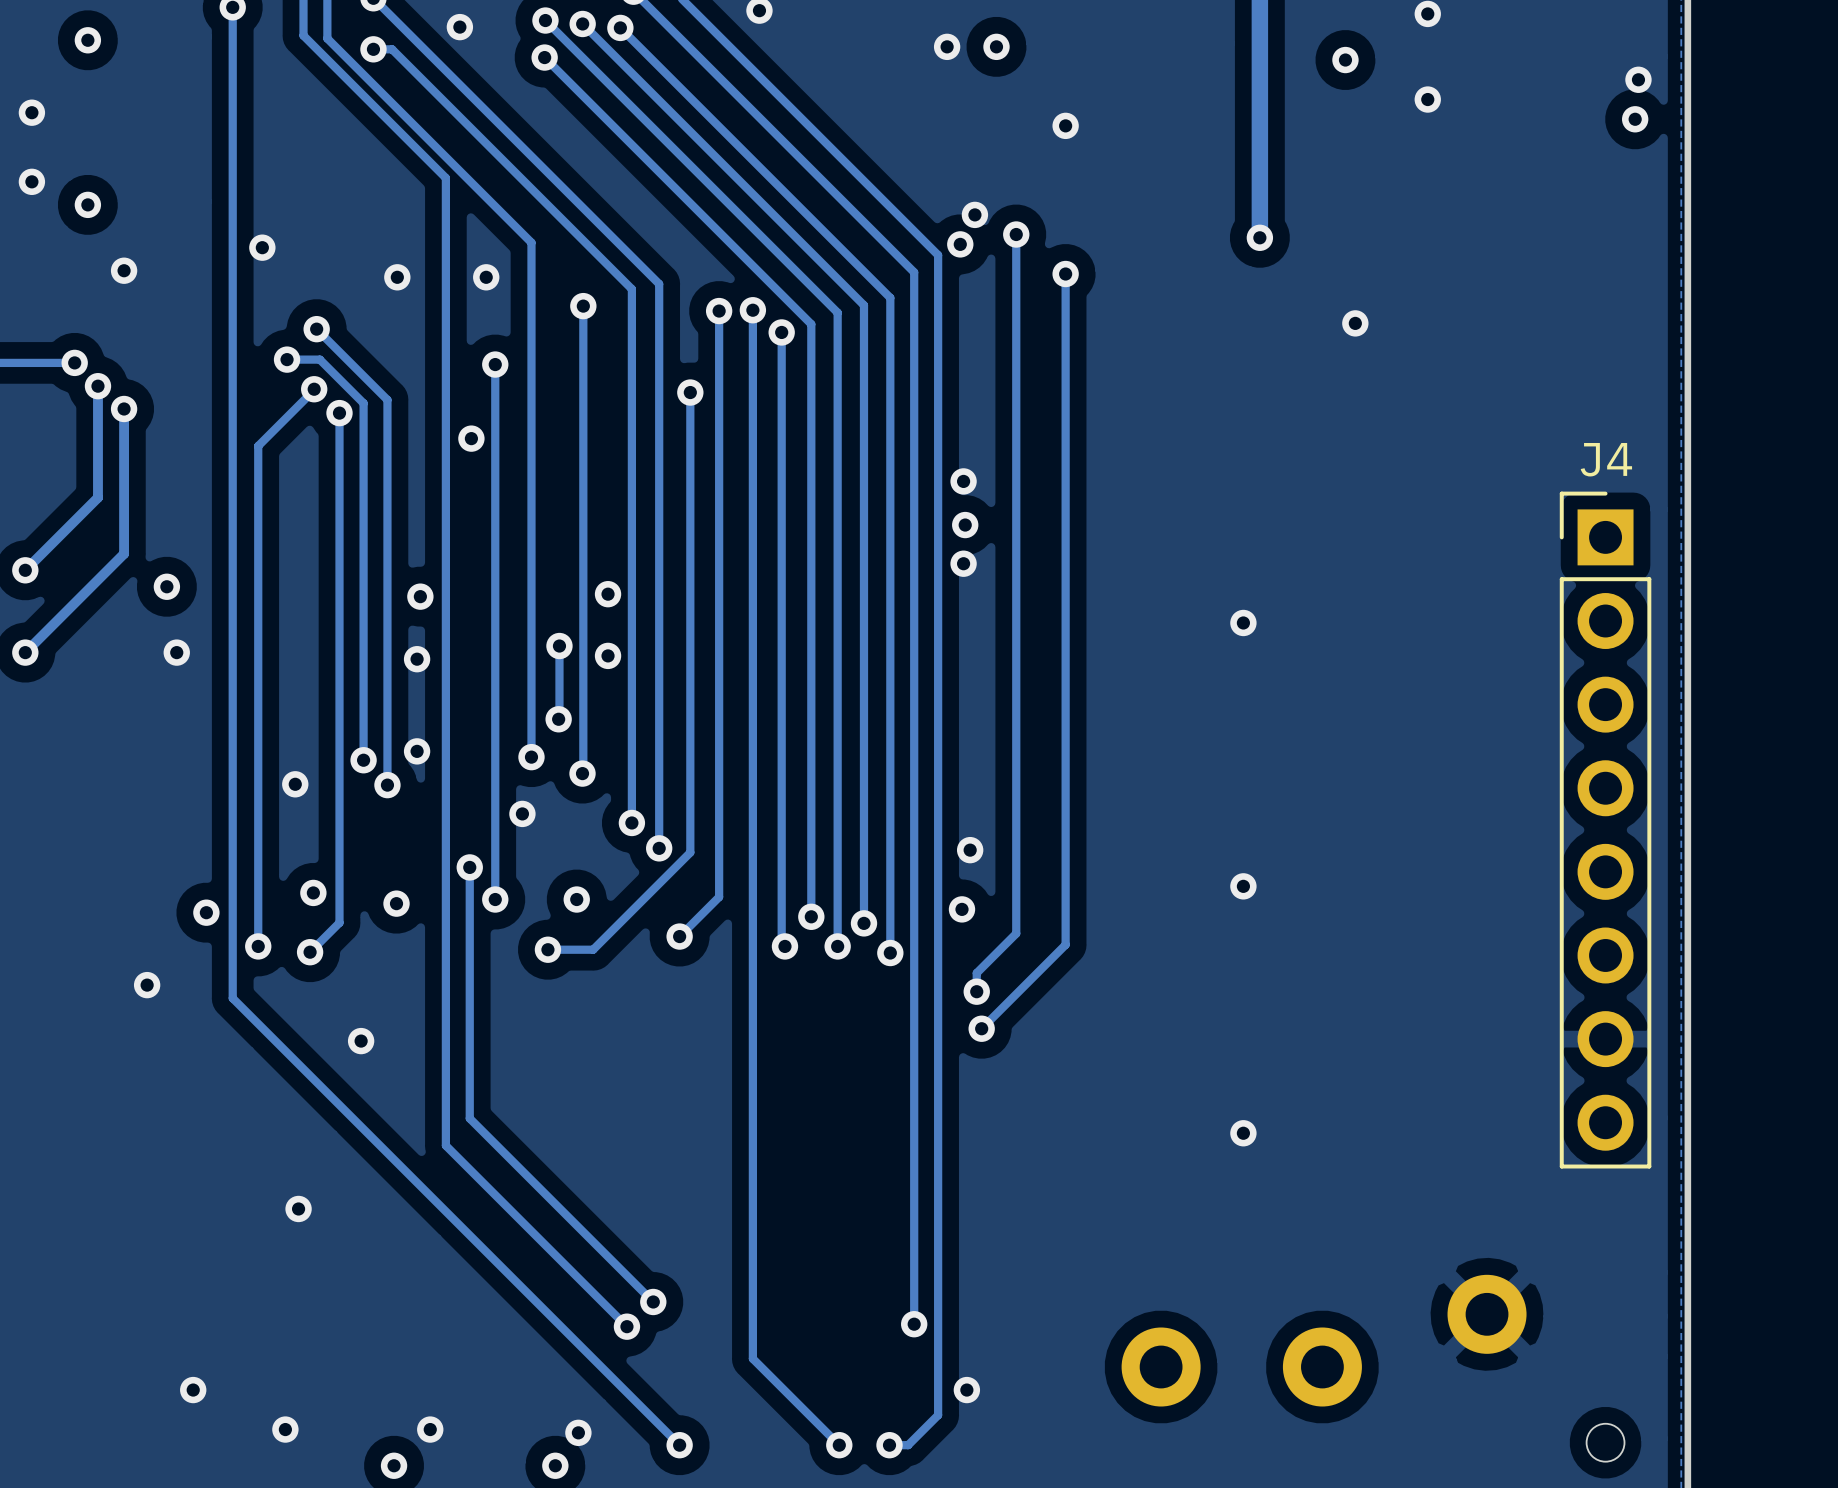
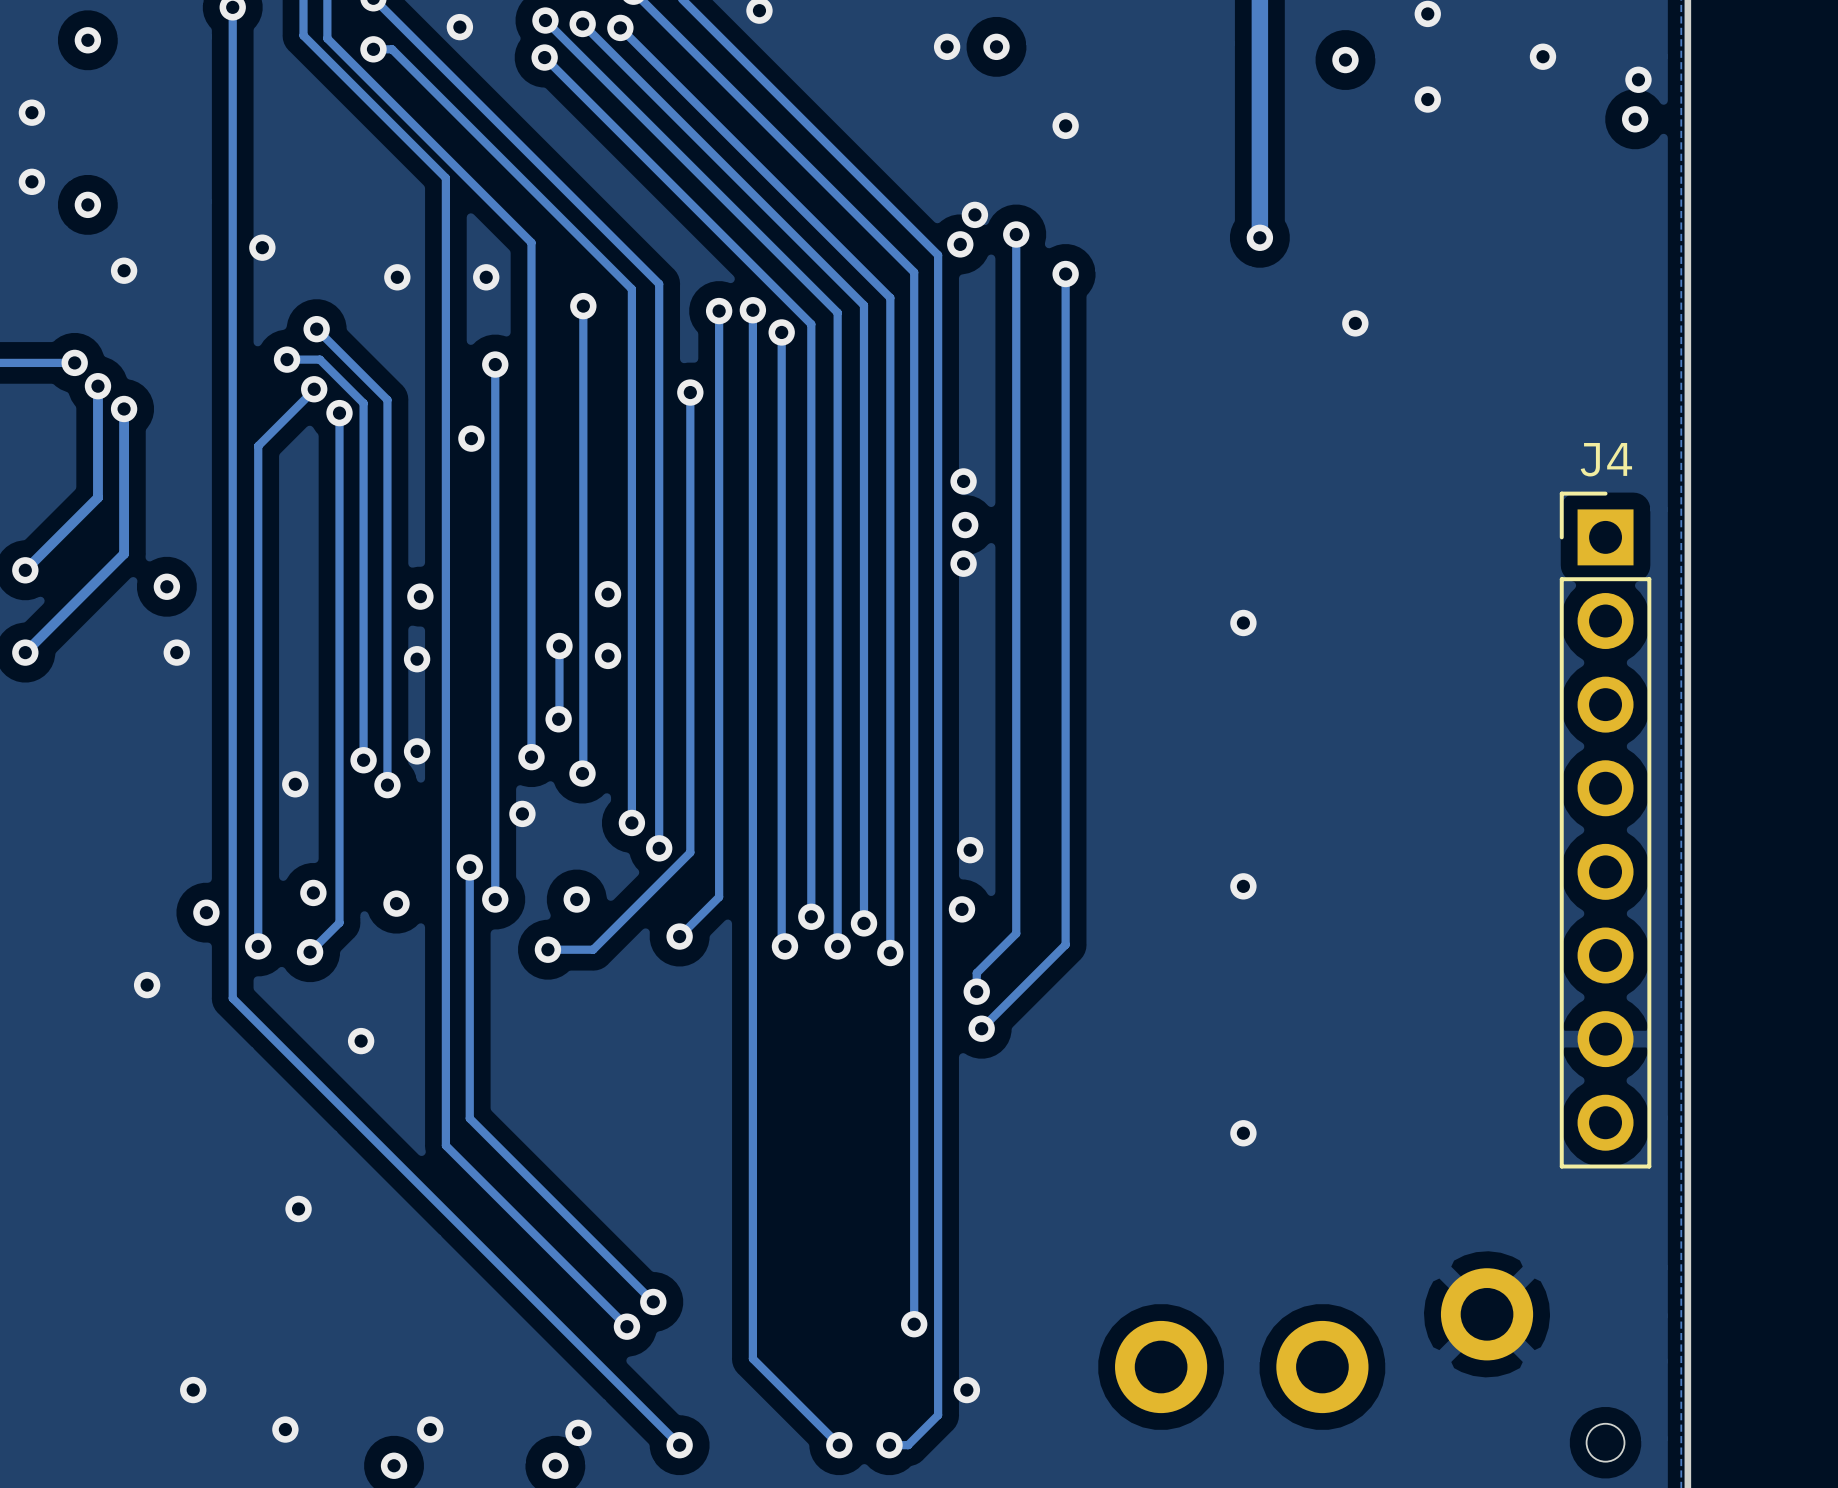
via: none -> (1542, 56)
part footprint: [1447, 1274, 1527, 1354] -> [1440, 1268, 1534, 1361]
part footprint: [1121, 1327, 1201, 1407] -> [1115, 1320, 1208, 1414]
part footprint: [1282, 1327, 1362, 1407] -> [1276, 1320, 1369, 1414]

